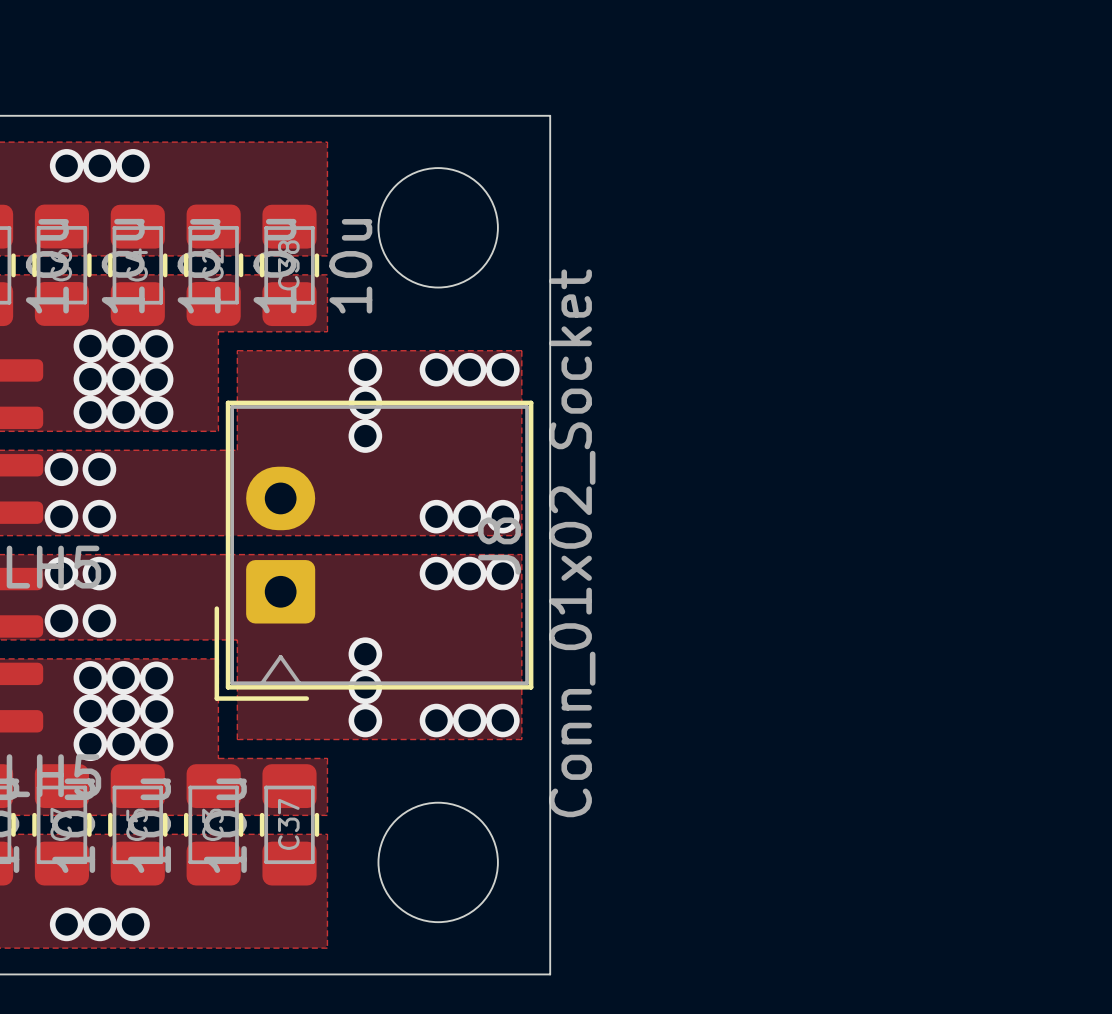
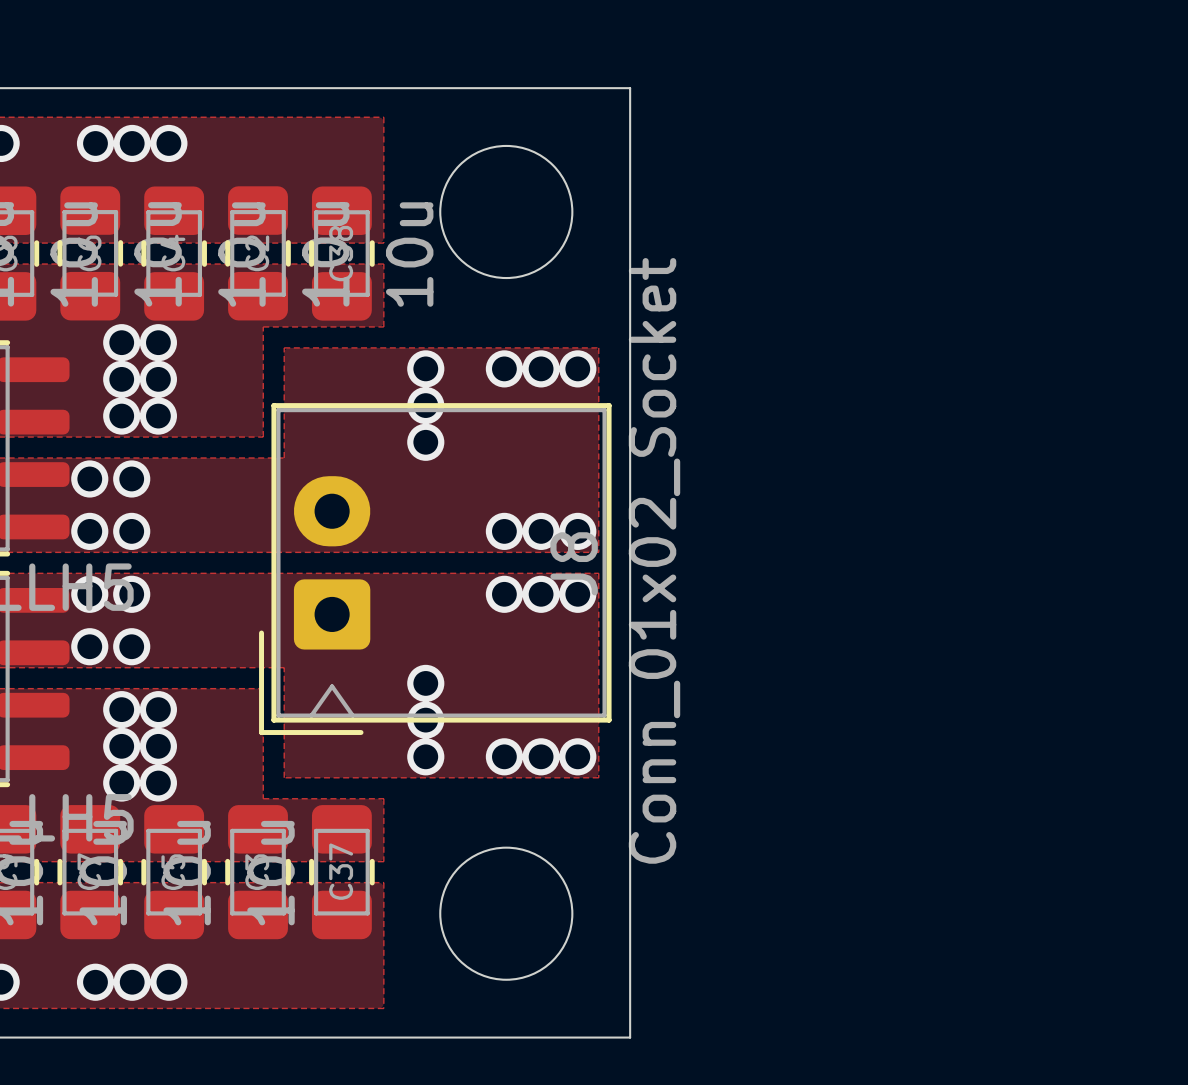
via: (156, 346) -> none
via: (156, 379) -> none
via: (156, 412) -> none
via: (156, 678) -> none
via: (156, 711) -> none
via: (156, 744) -> none

